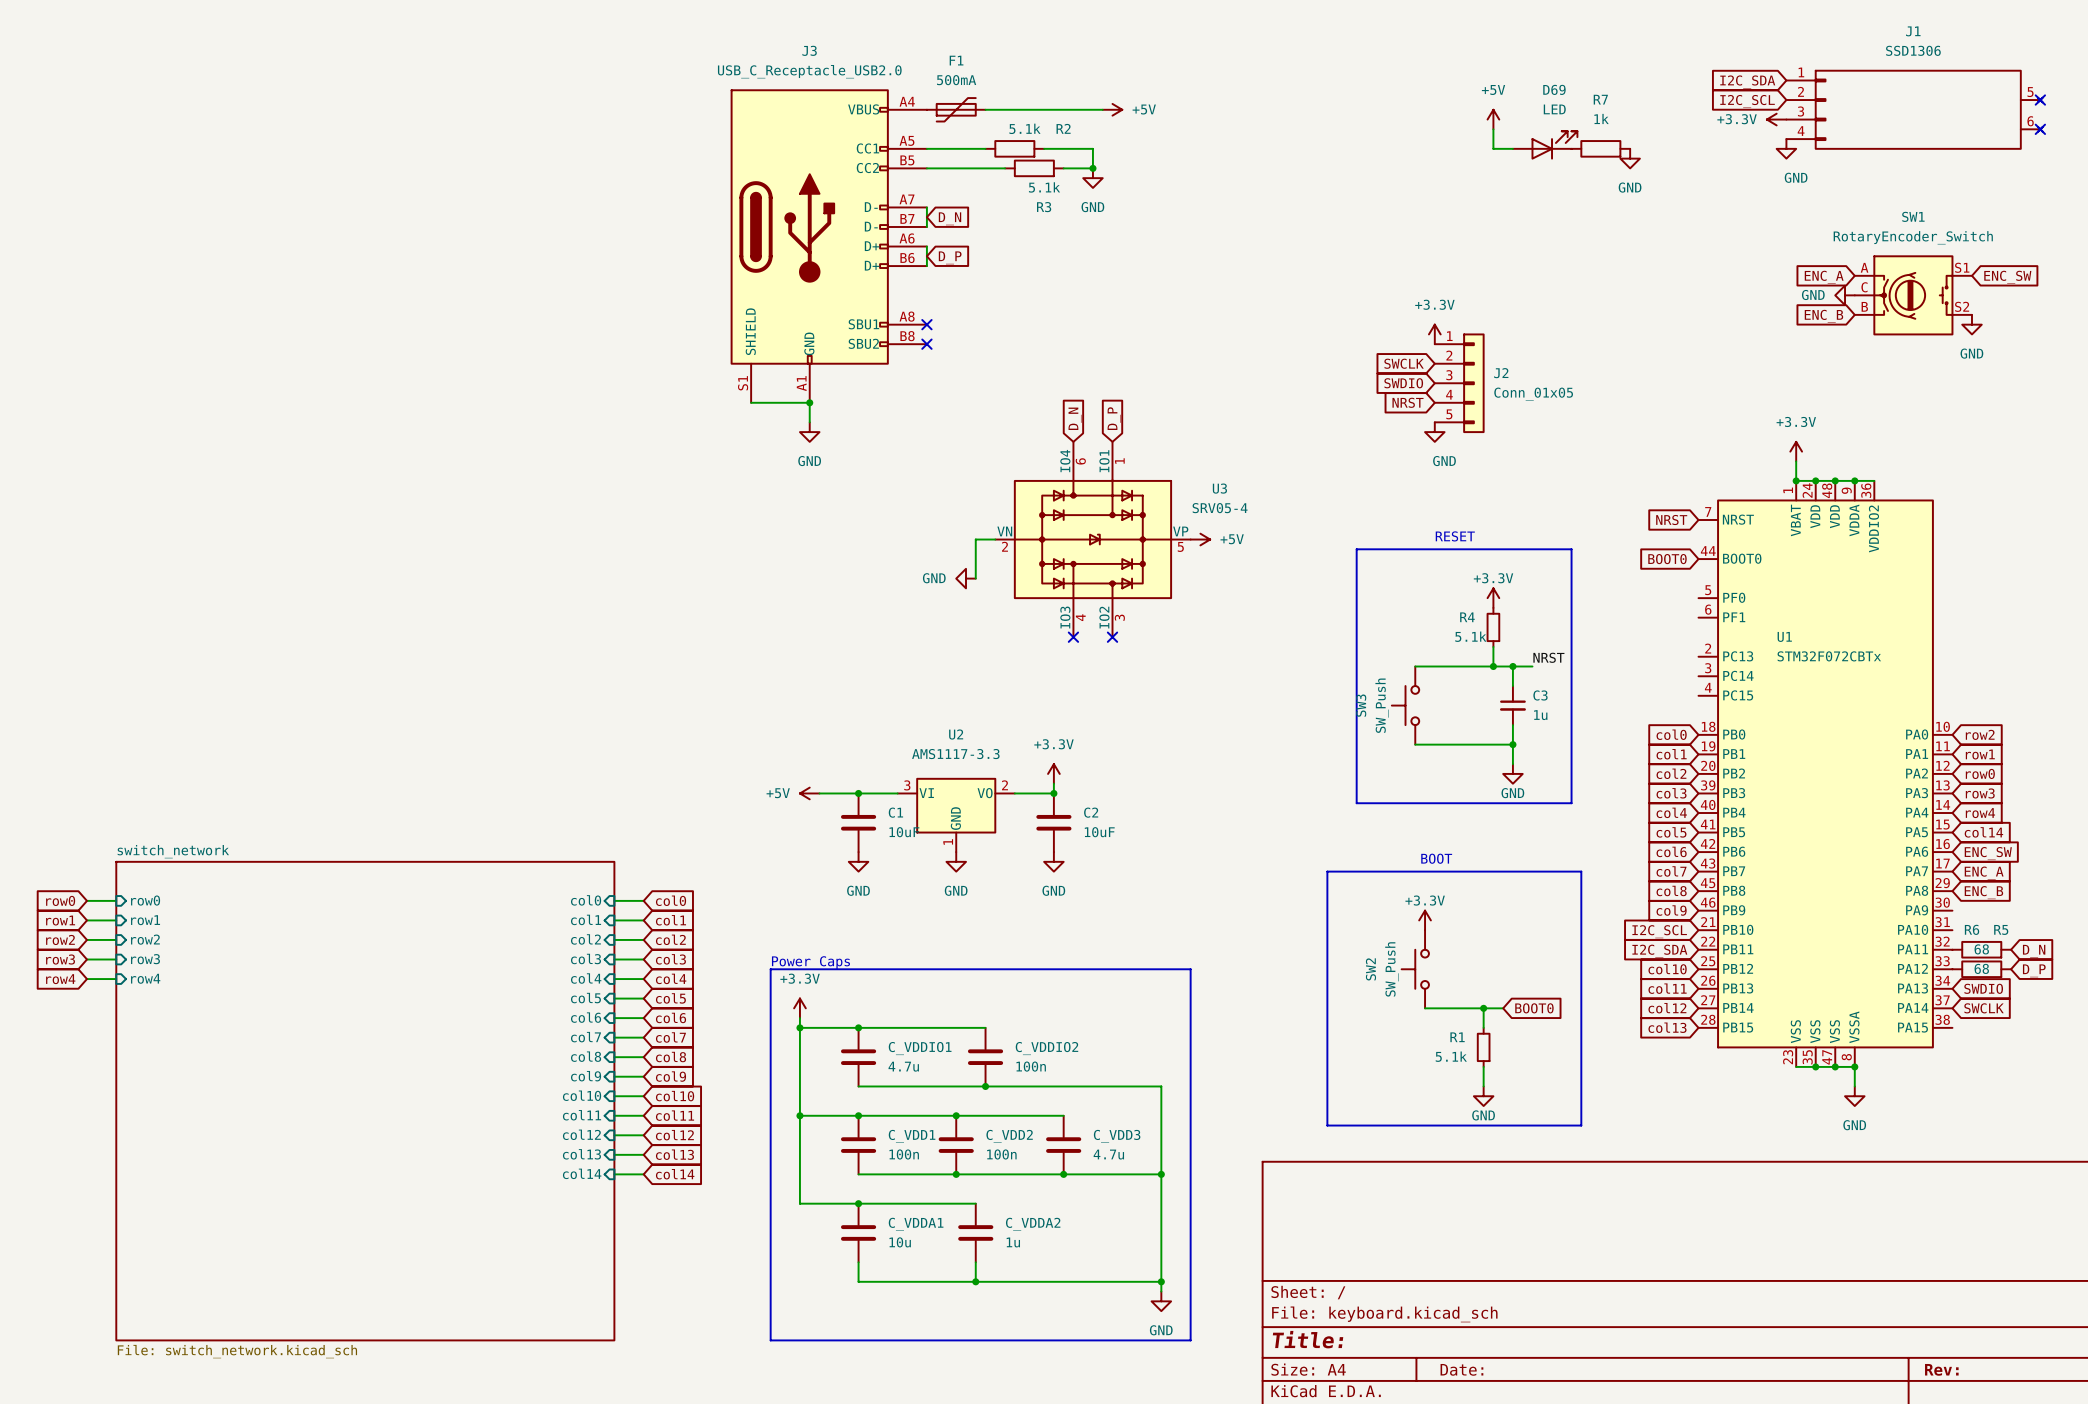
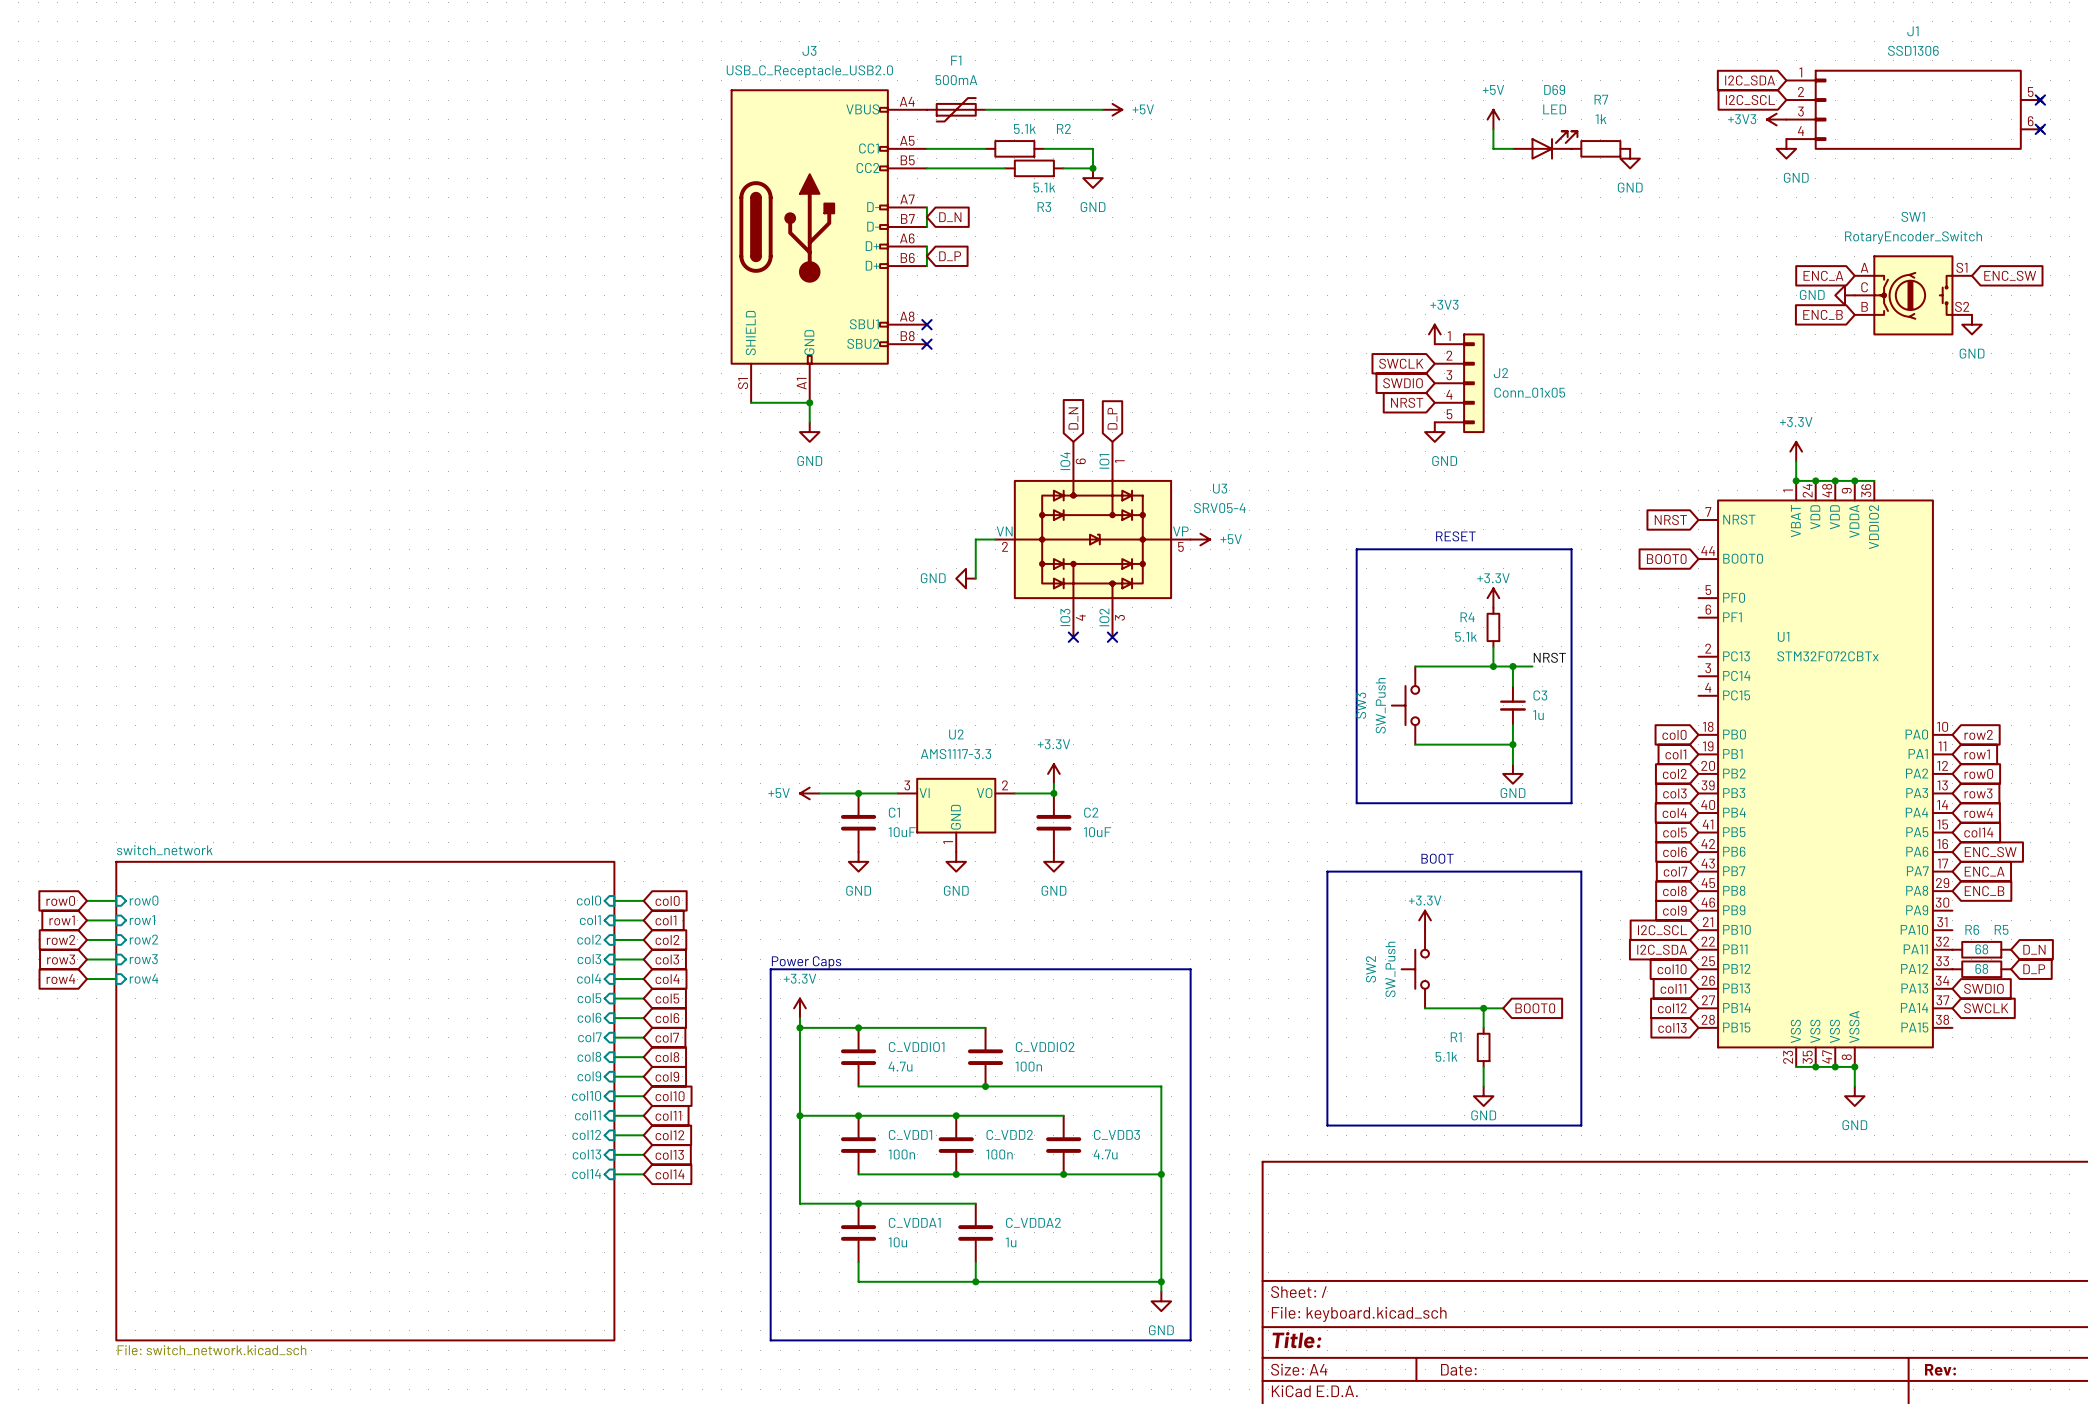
power symbol: +3.3V (1776, 119) -> +3V3 (1776, 119)
power symbol: +3.3V (1434, 334) -> +3V3 (1434, 334)

